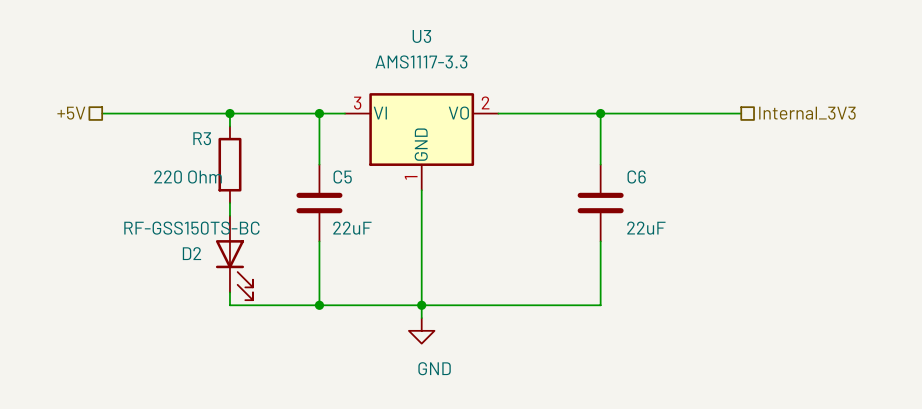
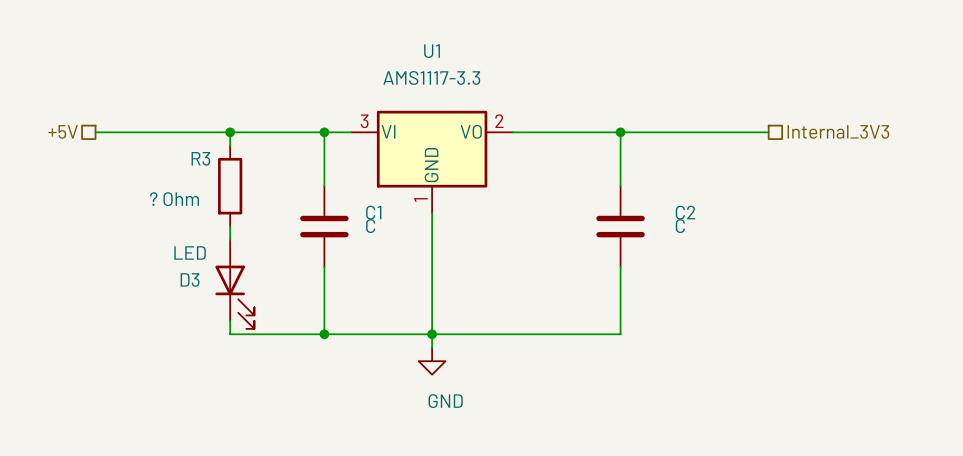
U3 name: U3 (421, 36) -> U1 (432, 51)
R3 value: 220 Ohm (188, 176) -> ? Ohm (174, 199)
C5 name: C5 (342, 176) -> C1 (373, 212)
C6 name: C6 (636, 176) -> C2 (685, 212)
D2 value: RF-GSS150TS-BC (191, 228) -> LED (190, 252)
C5 value: 22uF (352, 228) -> C (370, 226)
C6 value: 22uF (646, 228) -> C (680, 226)
D2 name: D2 (191, 253) -> D3 (190, 279)

